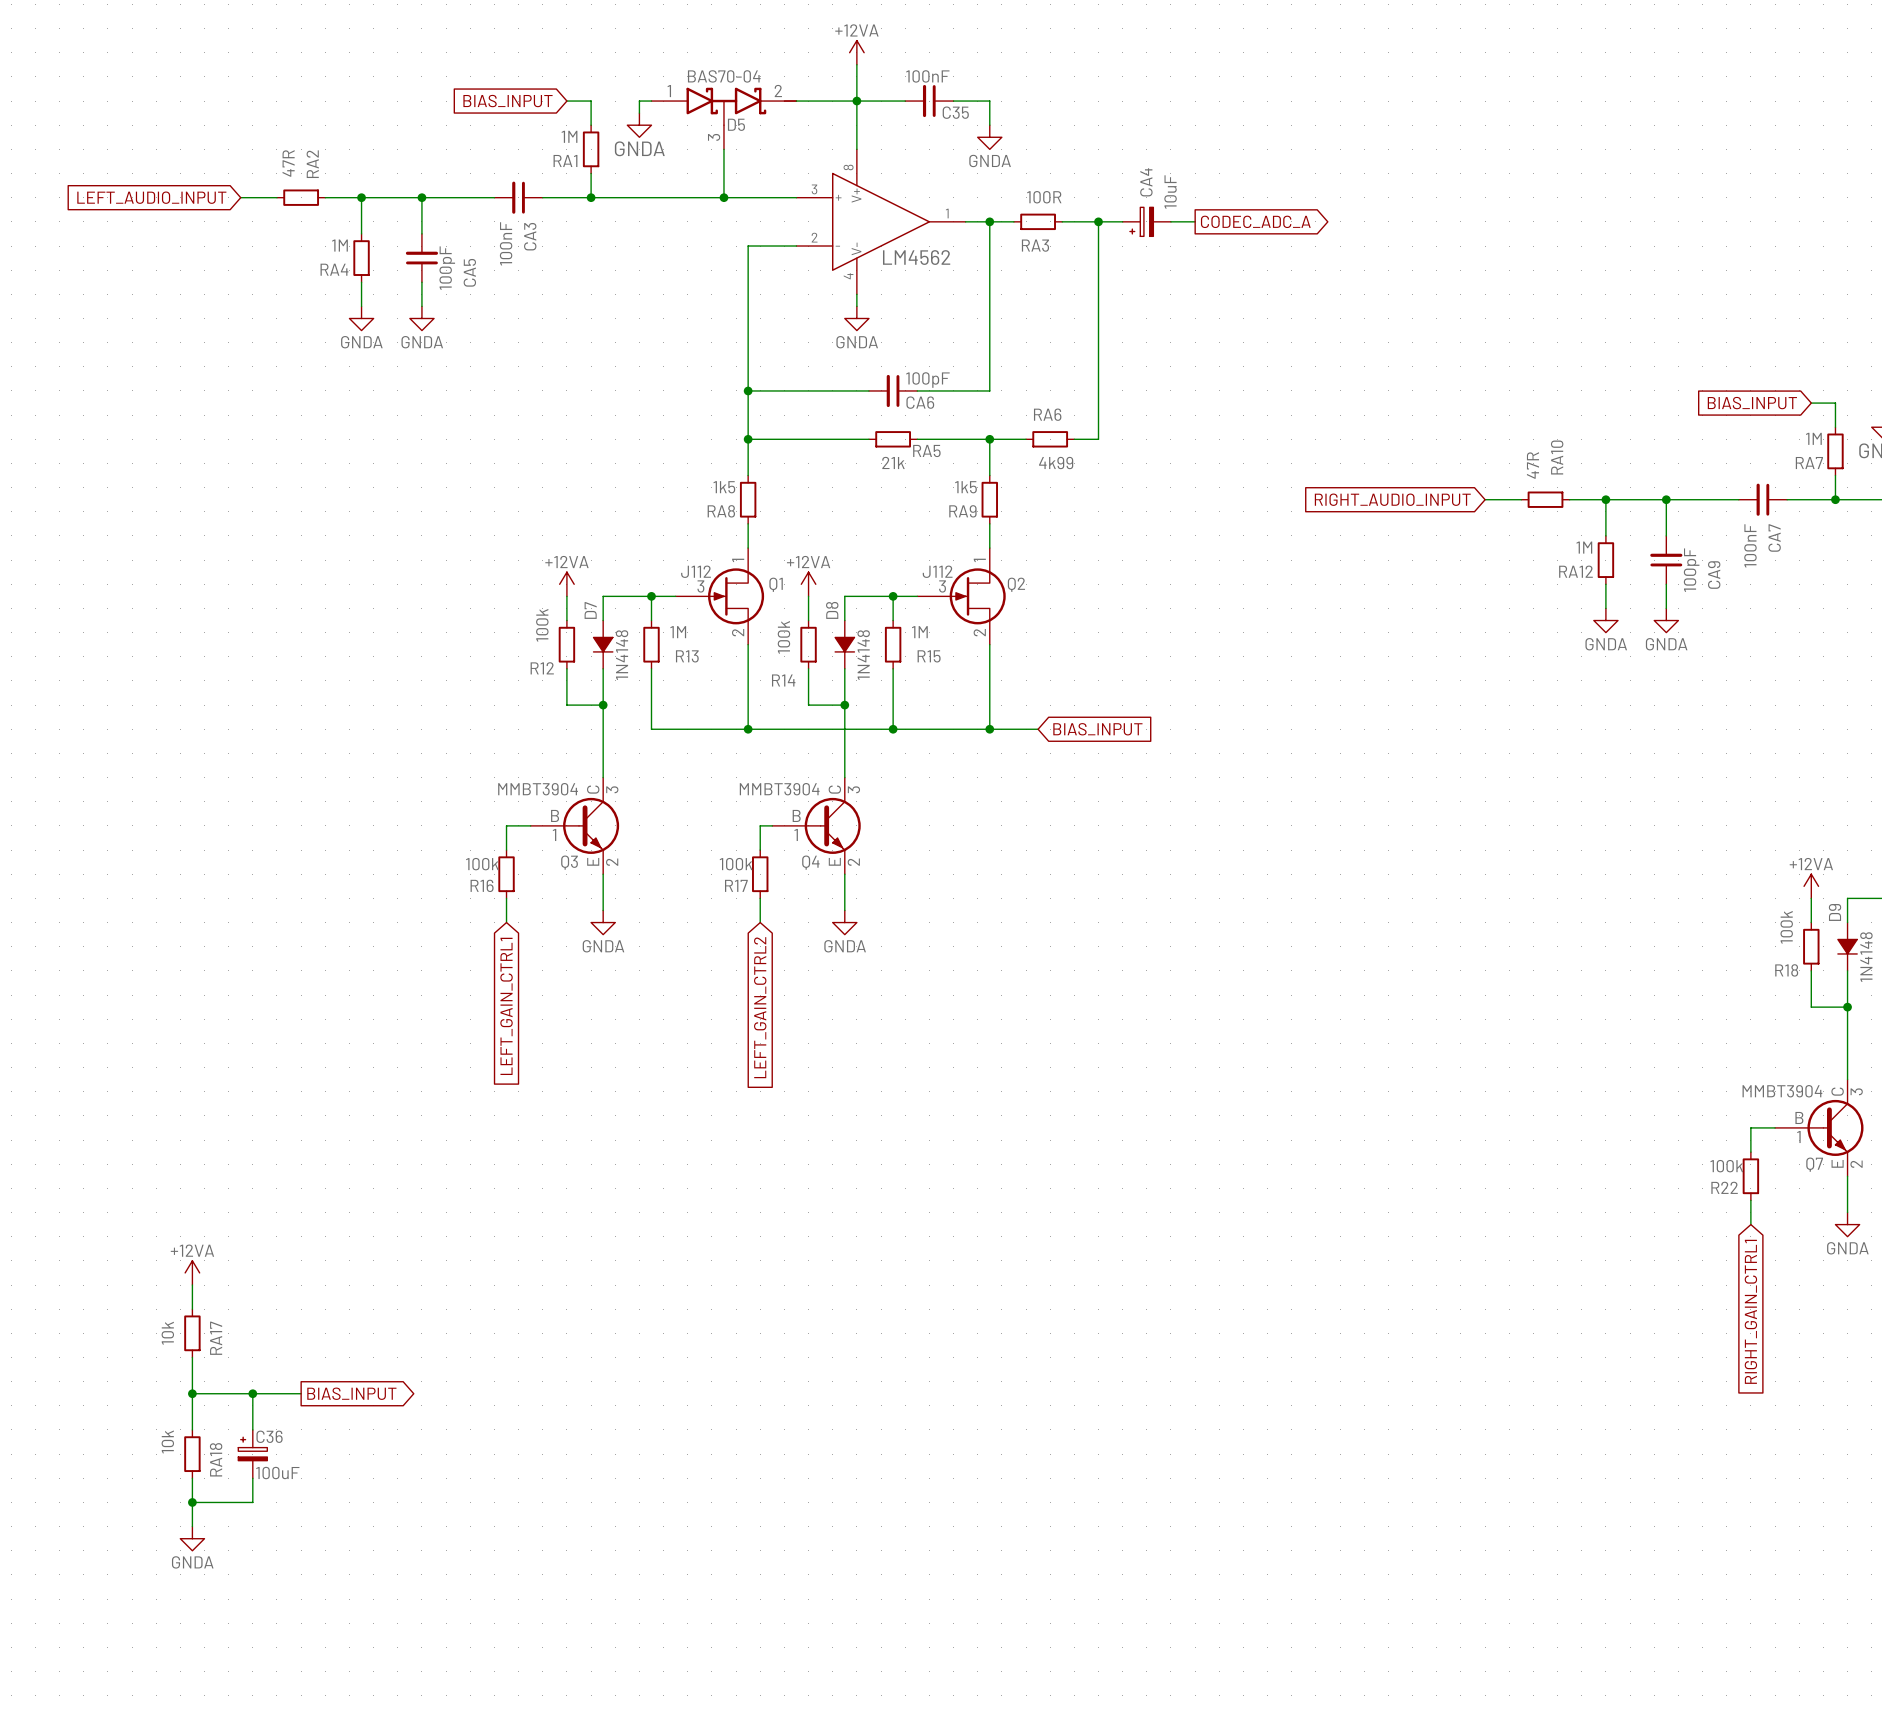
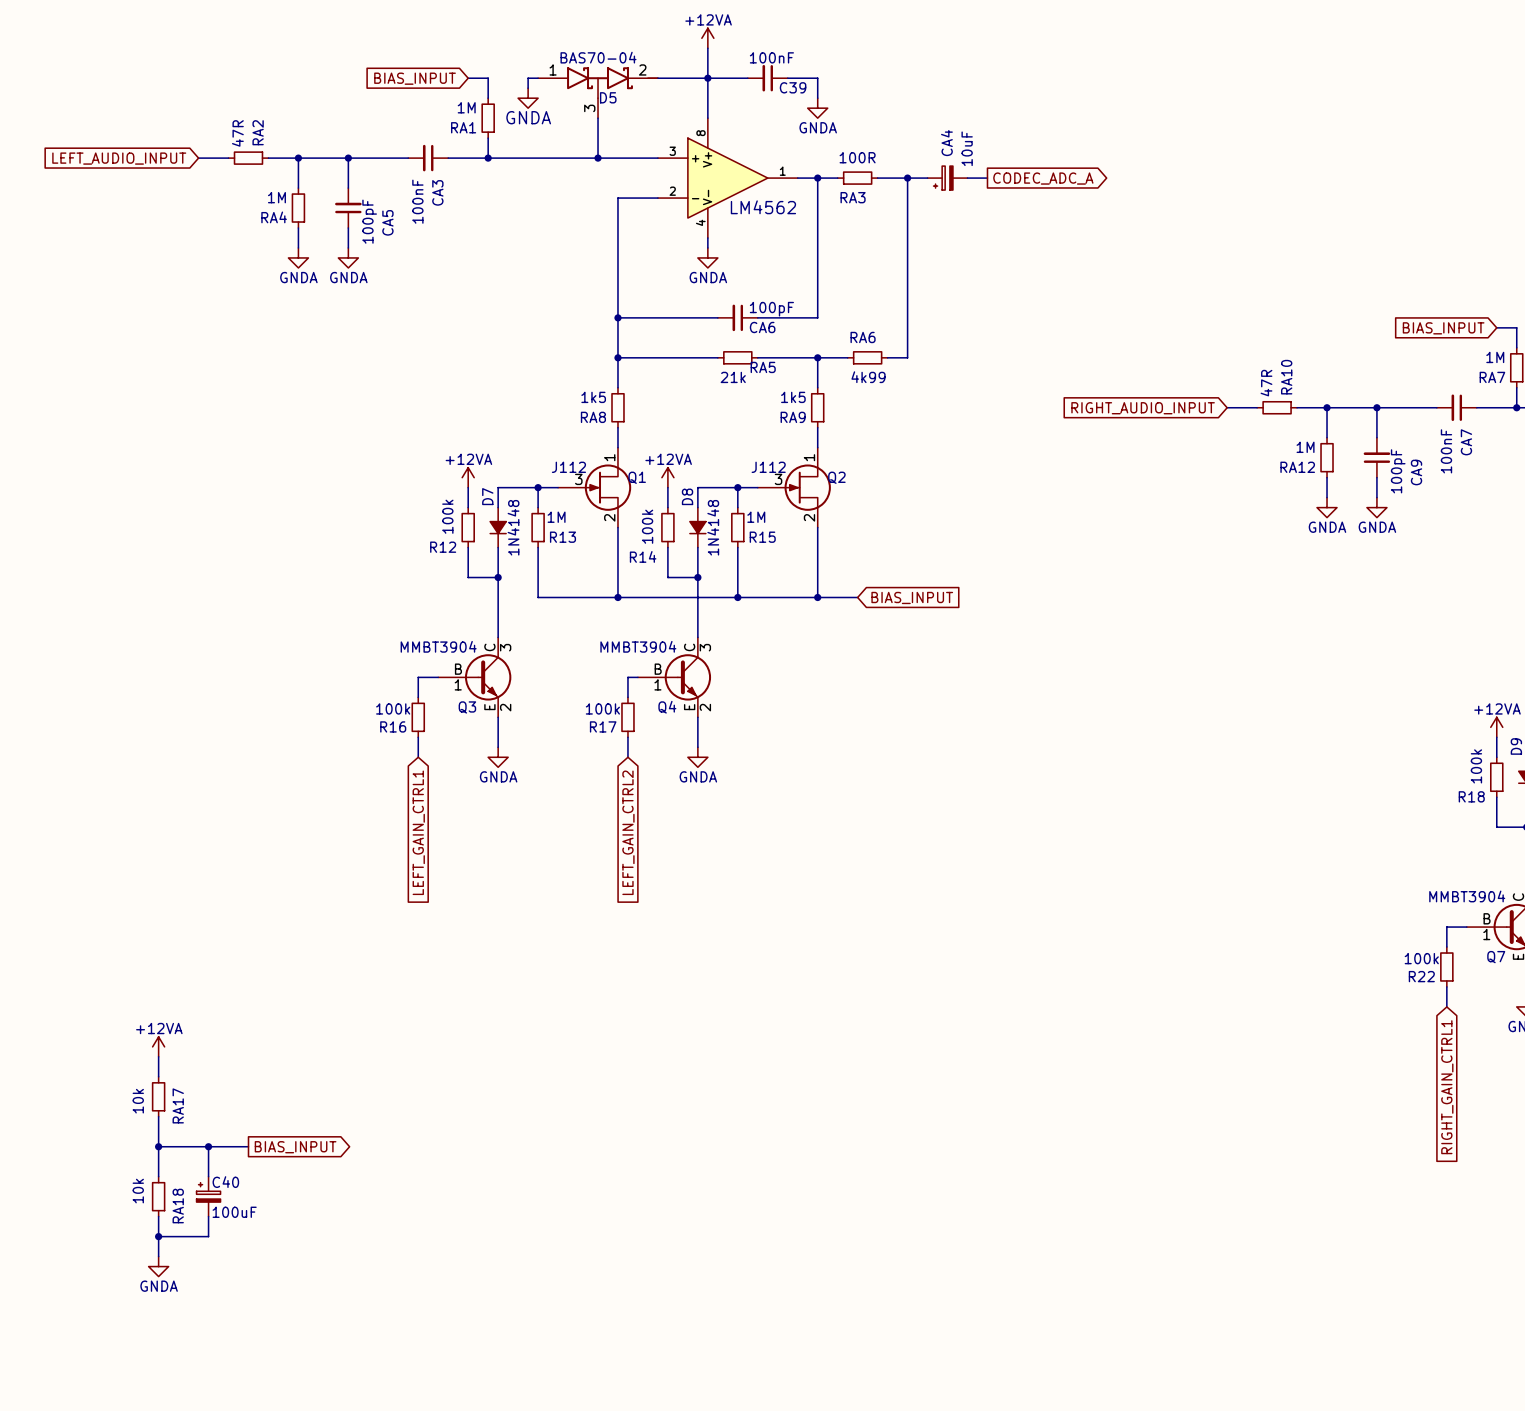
C35 name: C35 (955, 112) -> C39 (793, 87)
C36 name: C36 (269, 1436) -> C40 (225, 1182)

